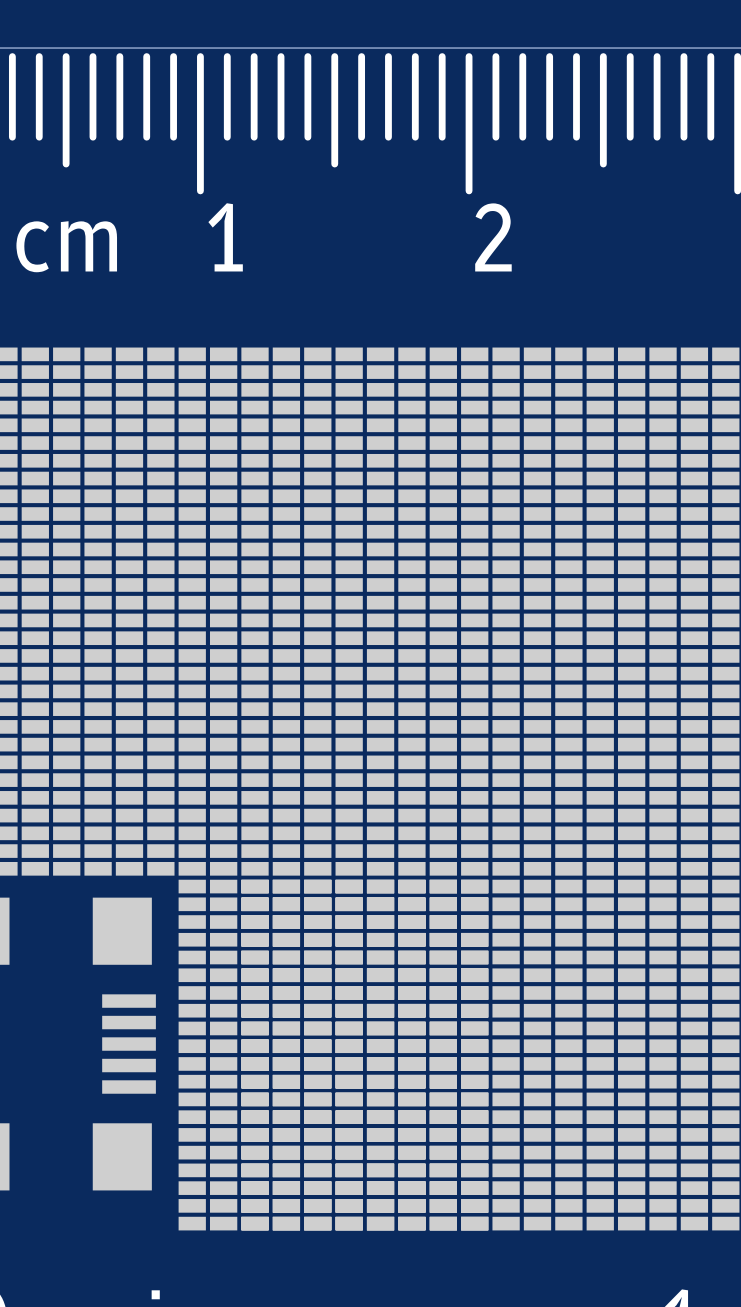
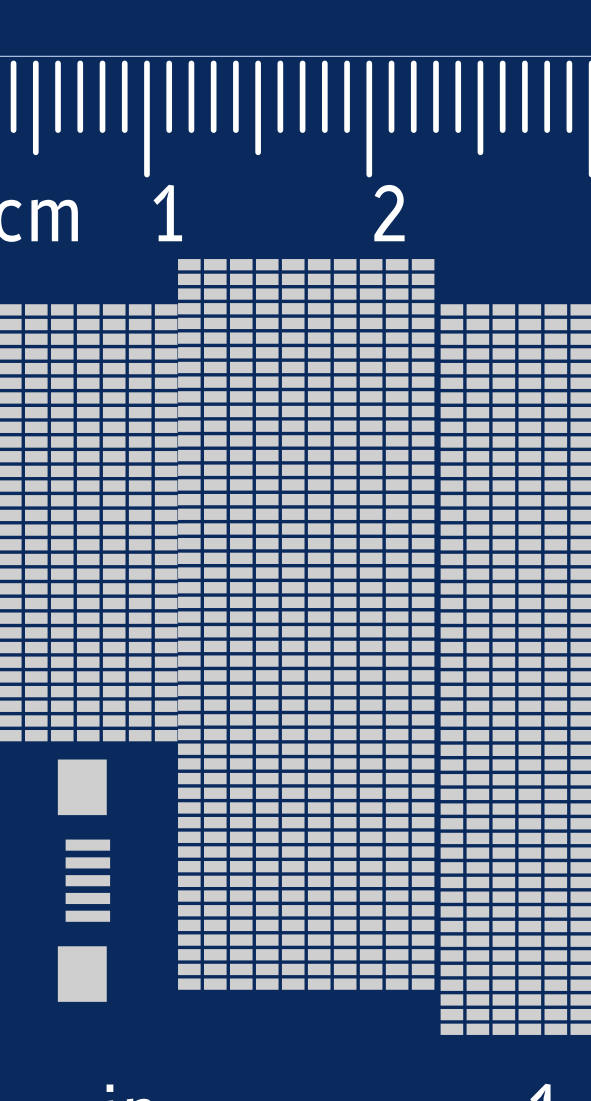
part position: (396, 434) -> (306, 330)
part position: (396, 611) -> (306, 477)
part position: (396, 788) -> (306, 624)
part: none -> (306, 771)
part: (333, 966) -> none
part: (396, 966) -> none
part: none -> (306, 918)
part: (333, 1143) -> none
part: (396, 1143) -> none

